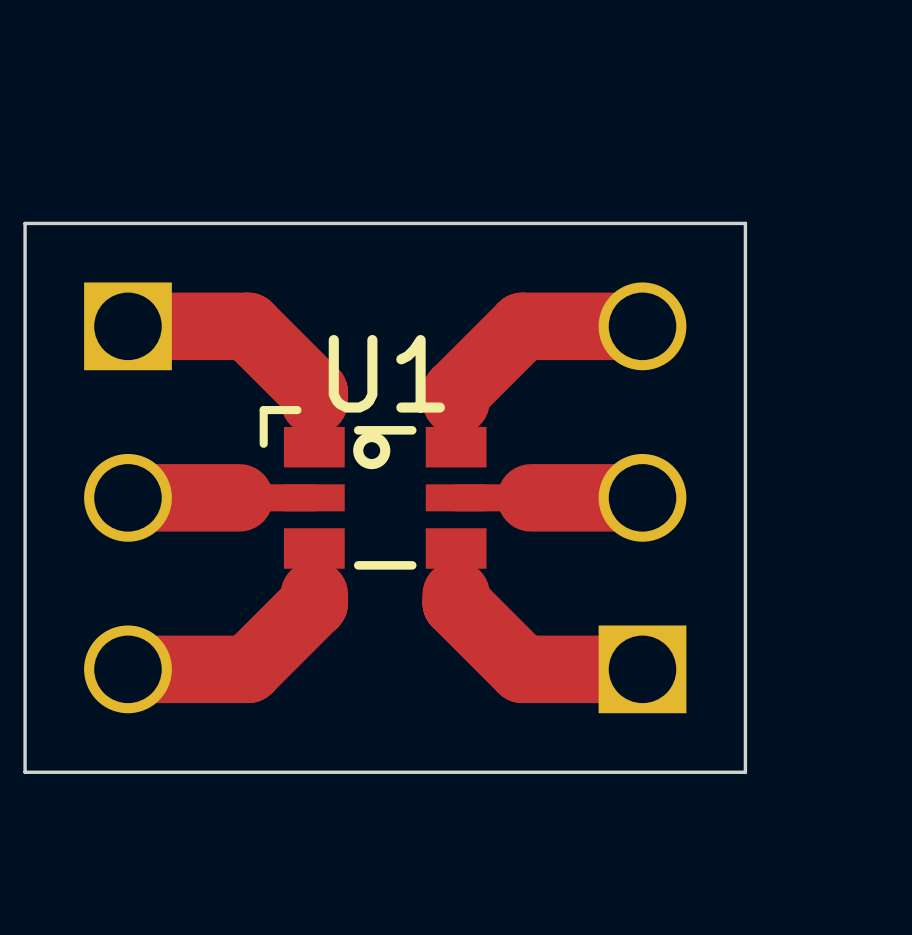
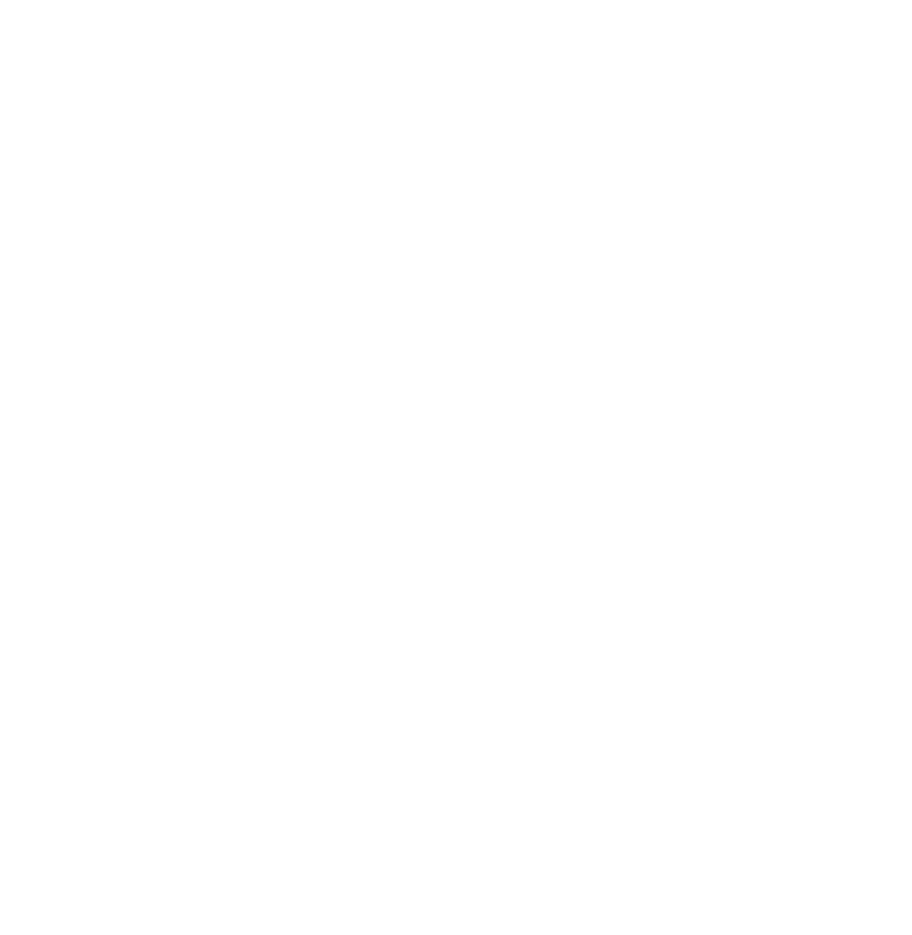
board edge: (25, 223) (25, 772) (745, 772) (745, 223) (25, 223) -> none
top track: (127, 326) (248, 326) (314, 392) (314, 447) -> none
top track: (642, 326) (522, 326) (456, 392) (456, 447) -> none
U1: (373, 487) -> none
top track: (127, 497) (314, 497) -> none
part: (127, 497) -> none
top track: (456, 497) (642, 497) -> none
part: (642, 497) -> none
top track: (314, 548) (314, 603) (248, 669) (127, 669) -> none
top track: (456, 548) (456, 603) (522, 669) (642, 669) -> none

